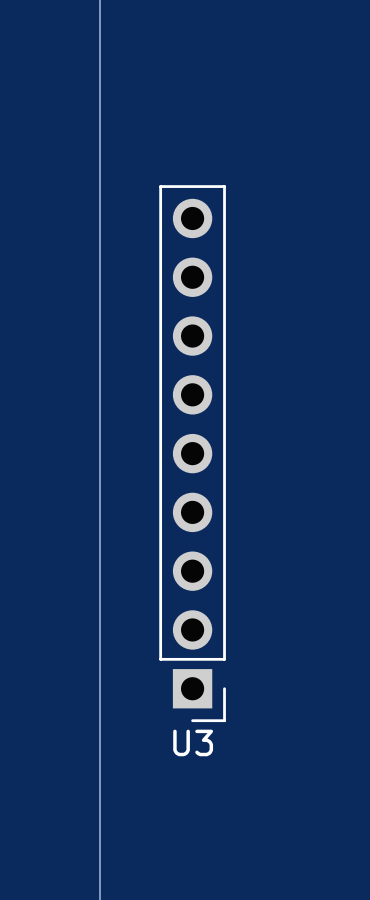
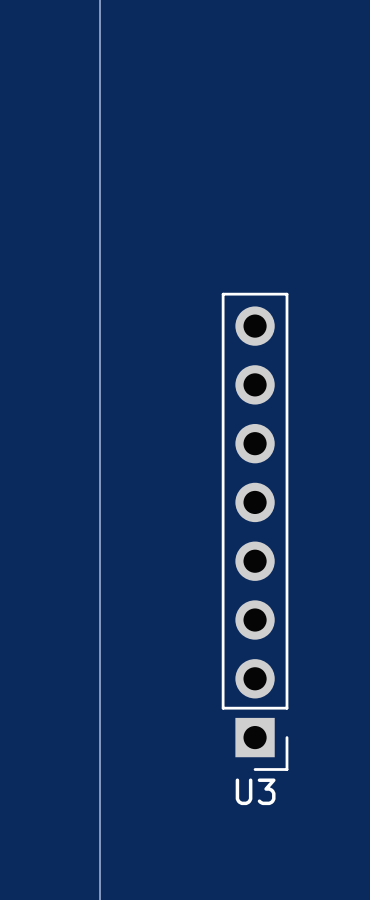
U3 footprint: [159, 185, 226, 723] -> [221, 292, 289, 771]

